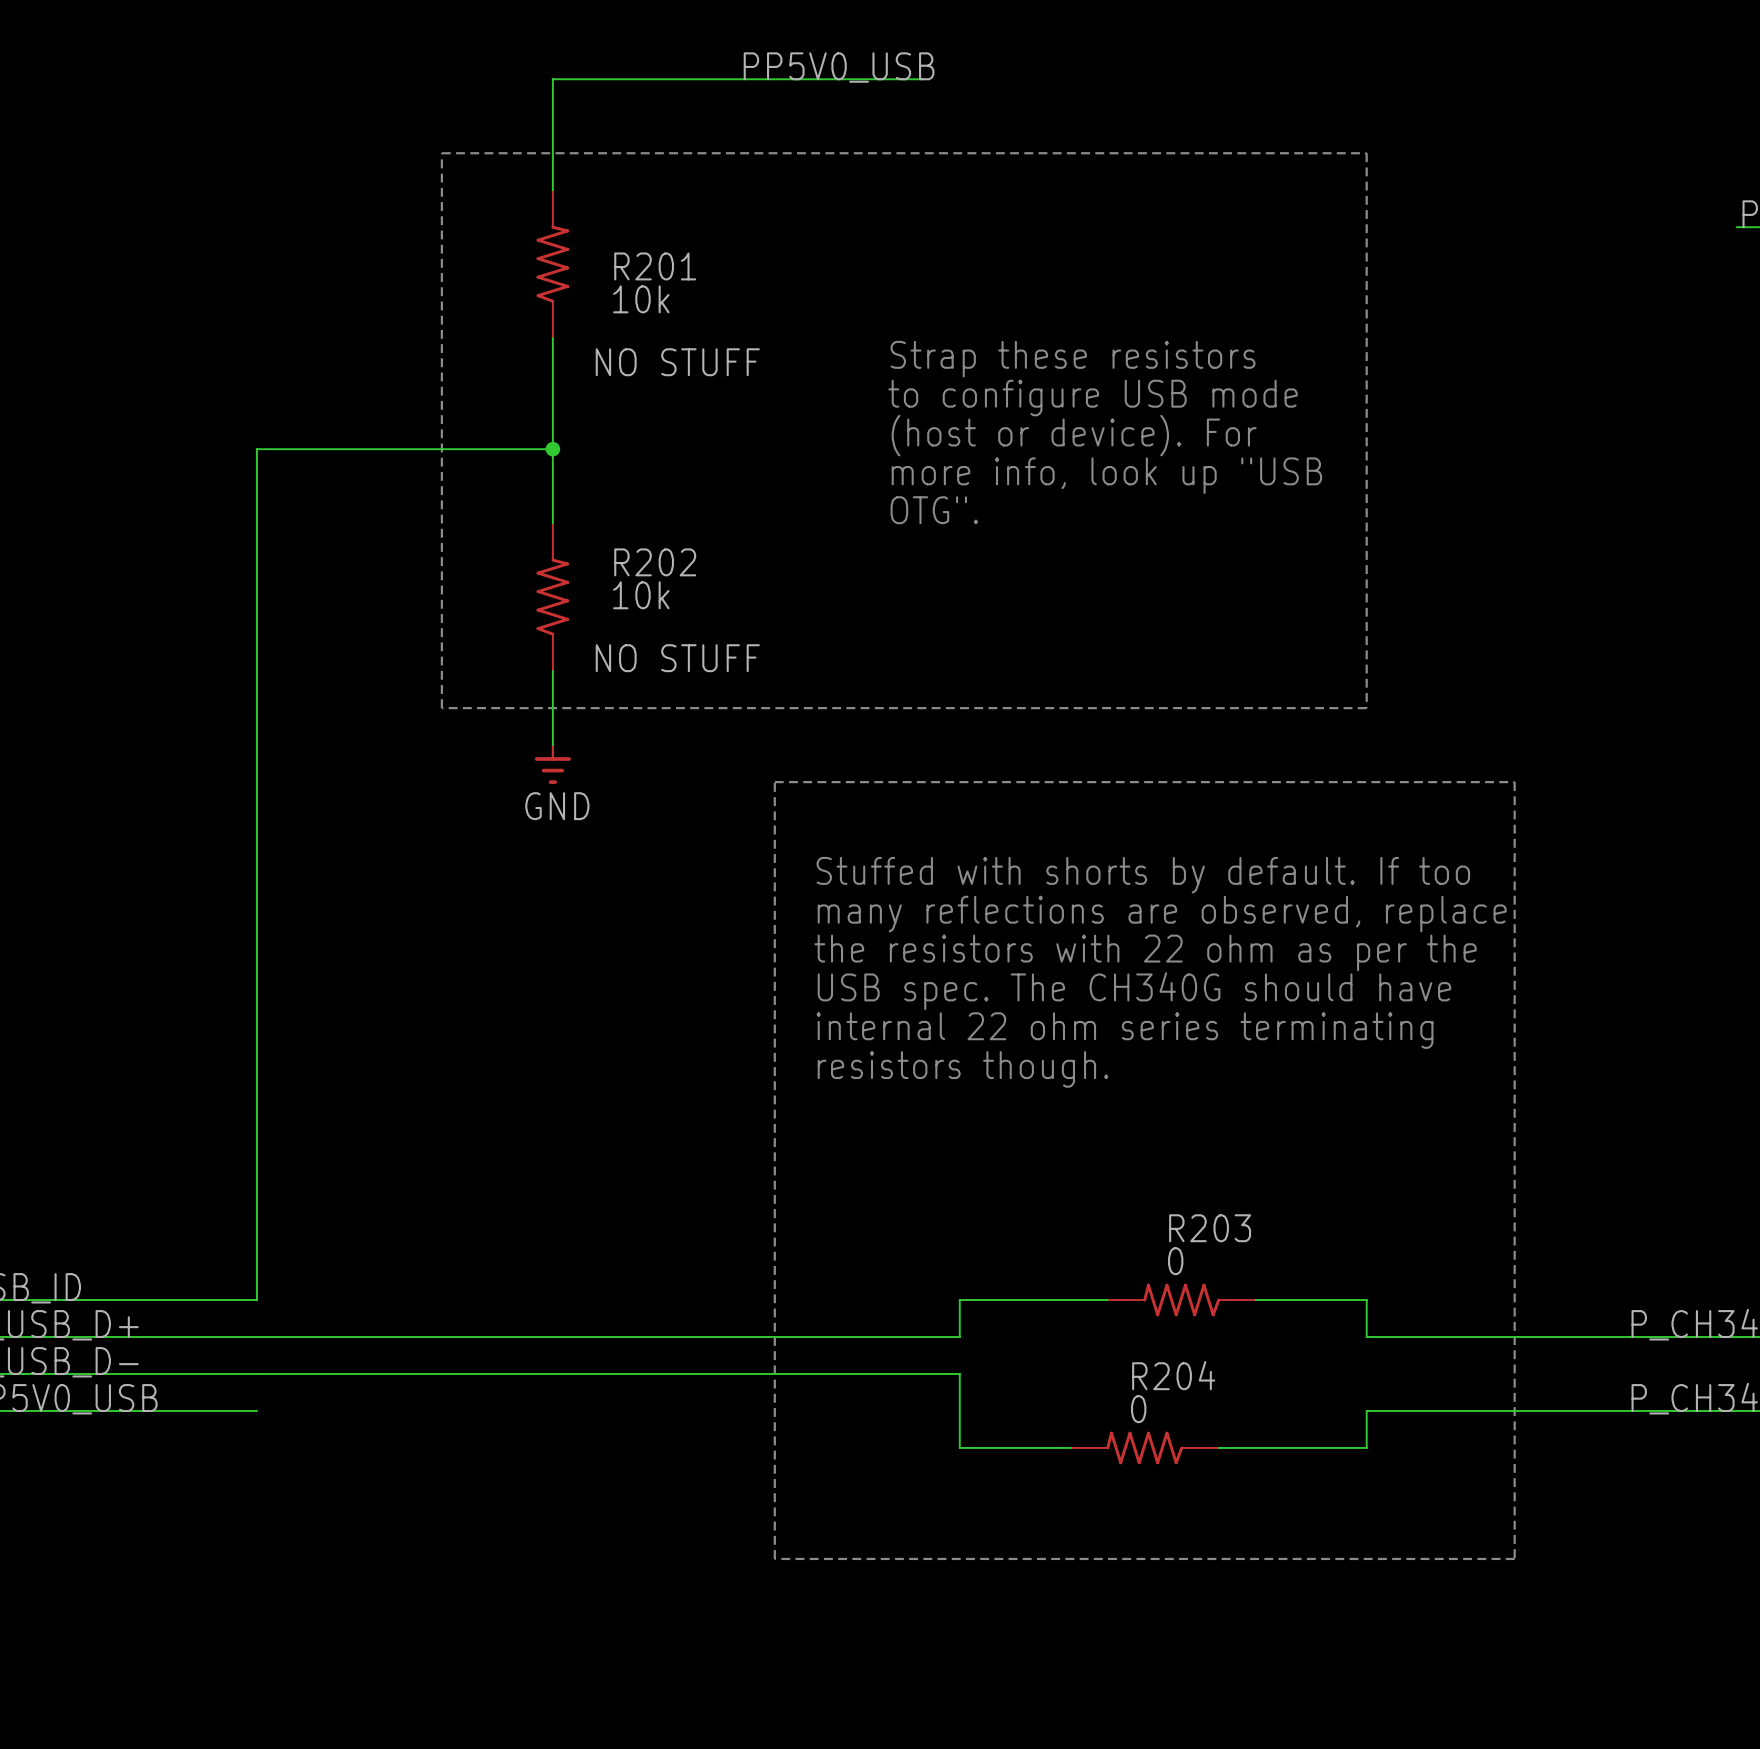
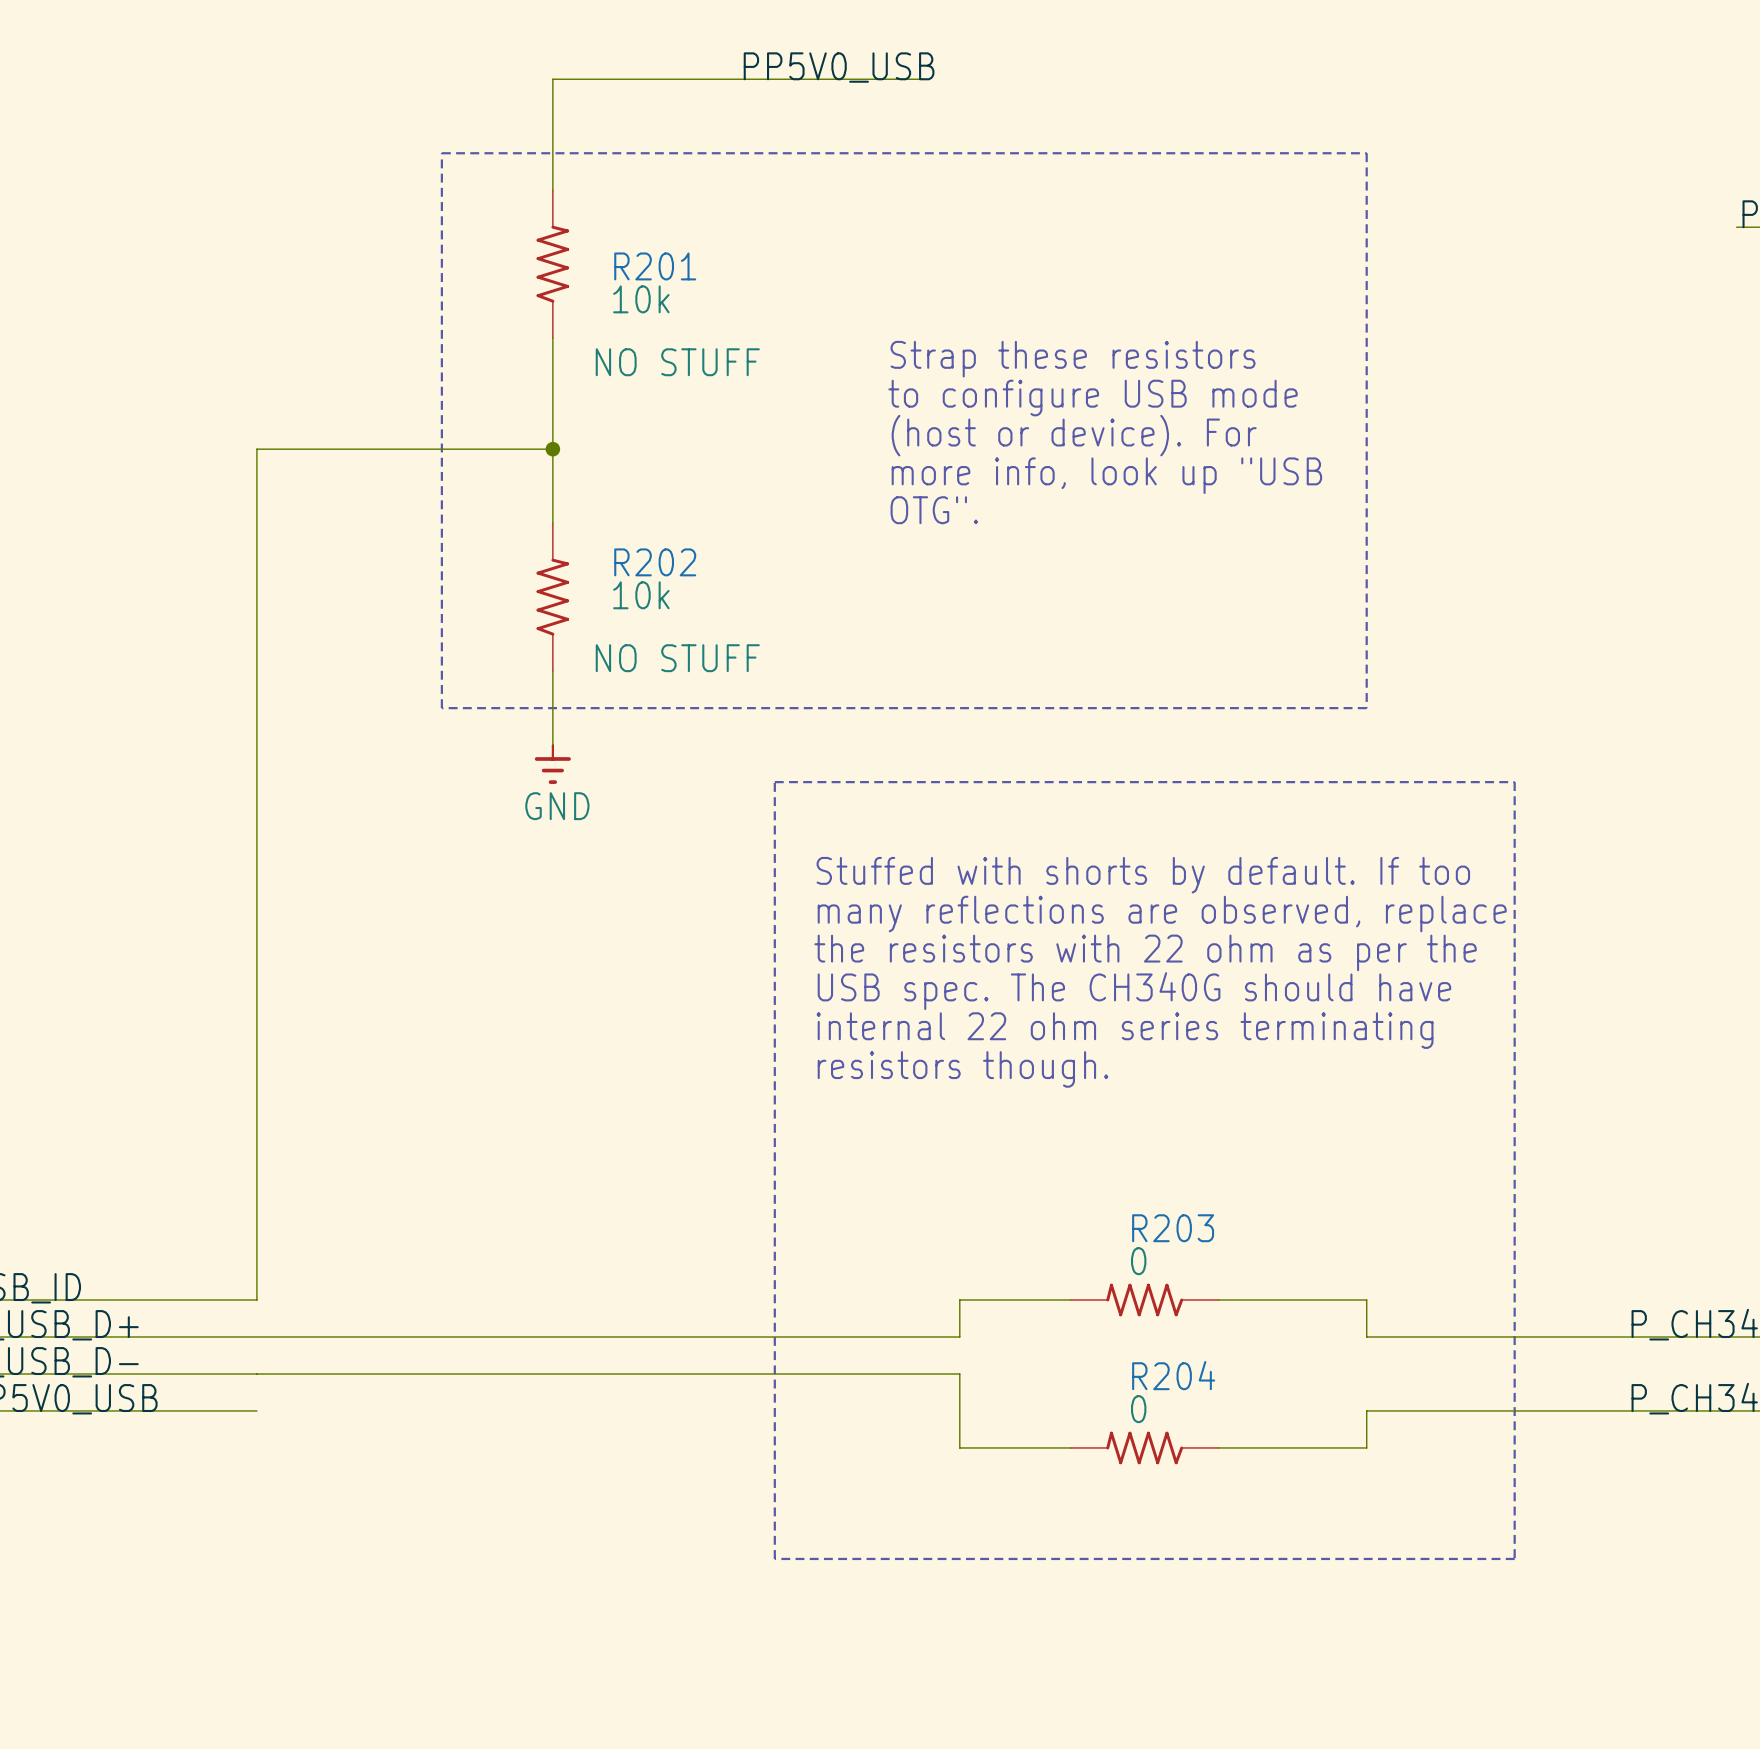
R203 position: (1181, 1300) -> (1144, 1300)

